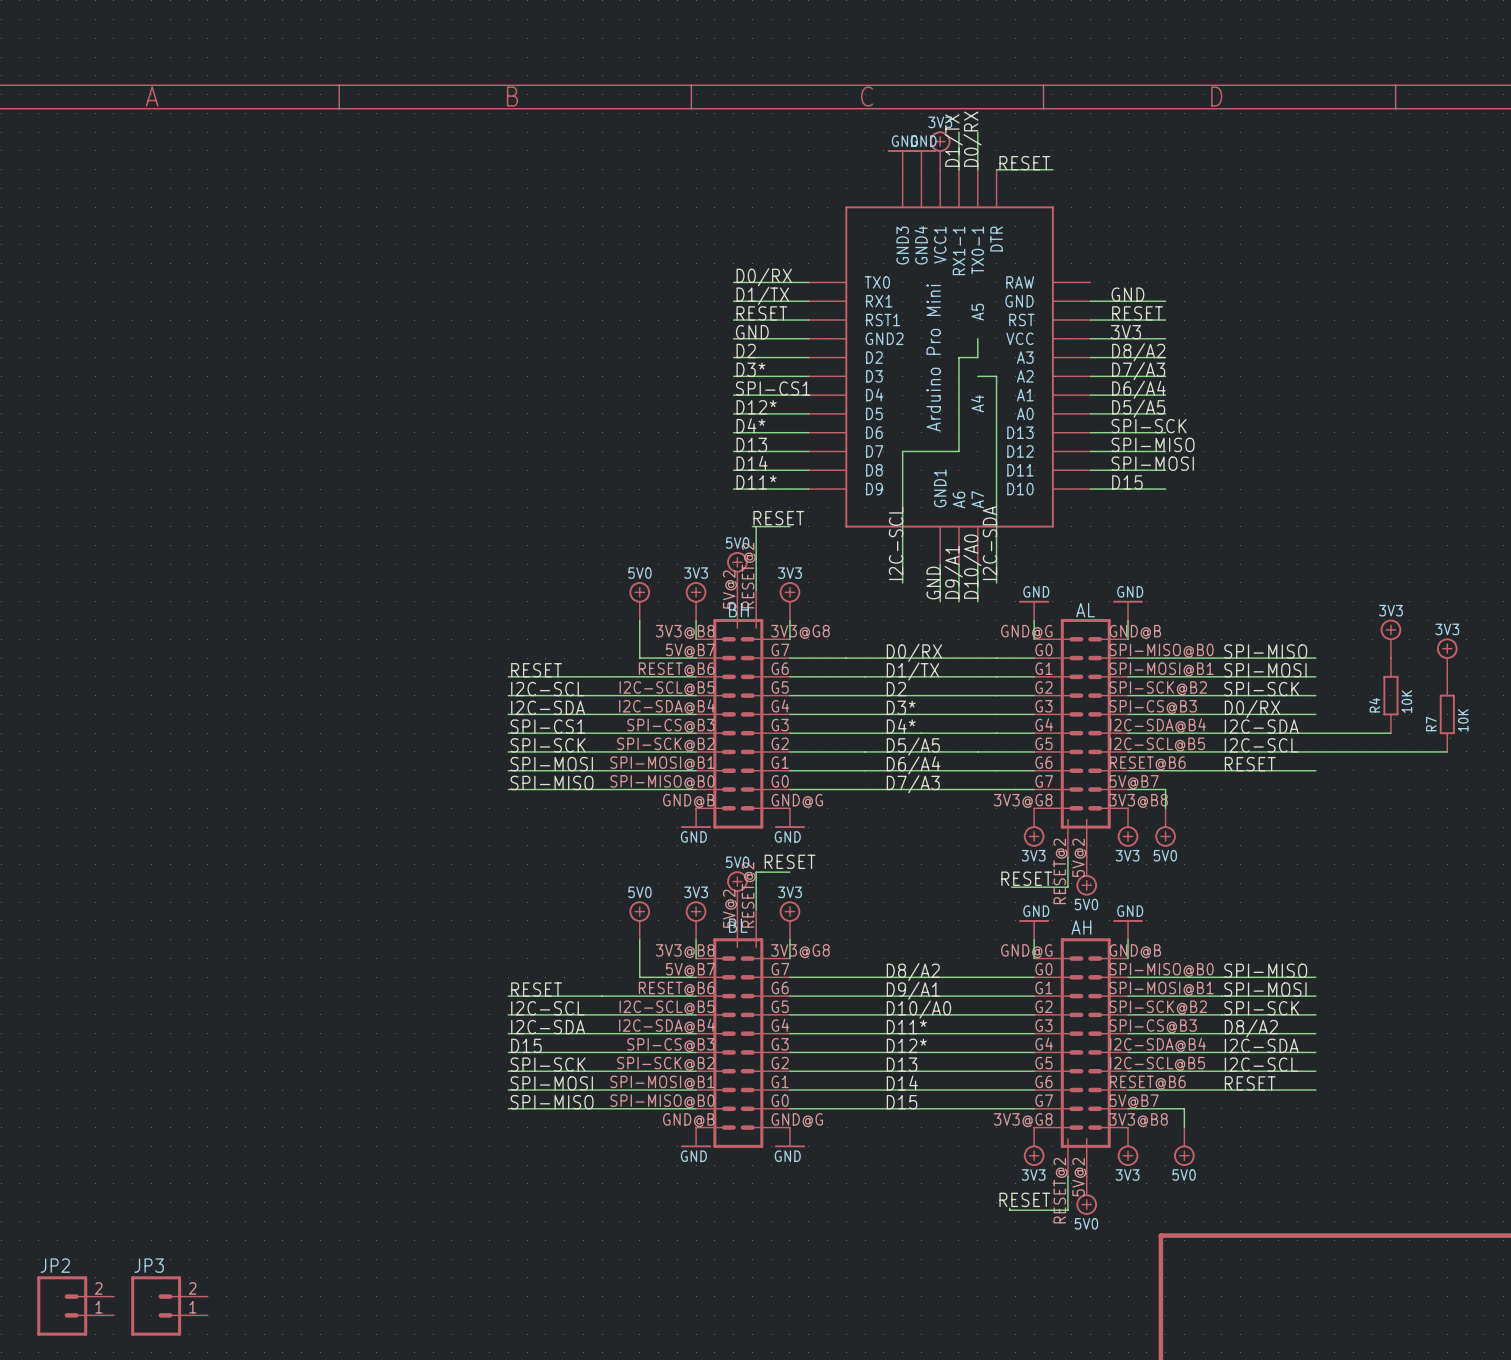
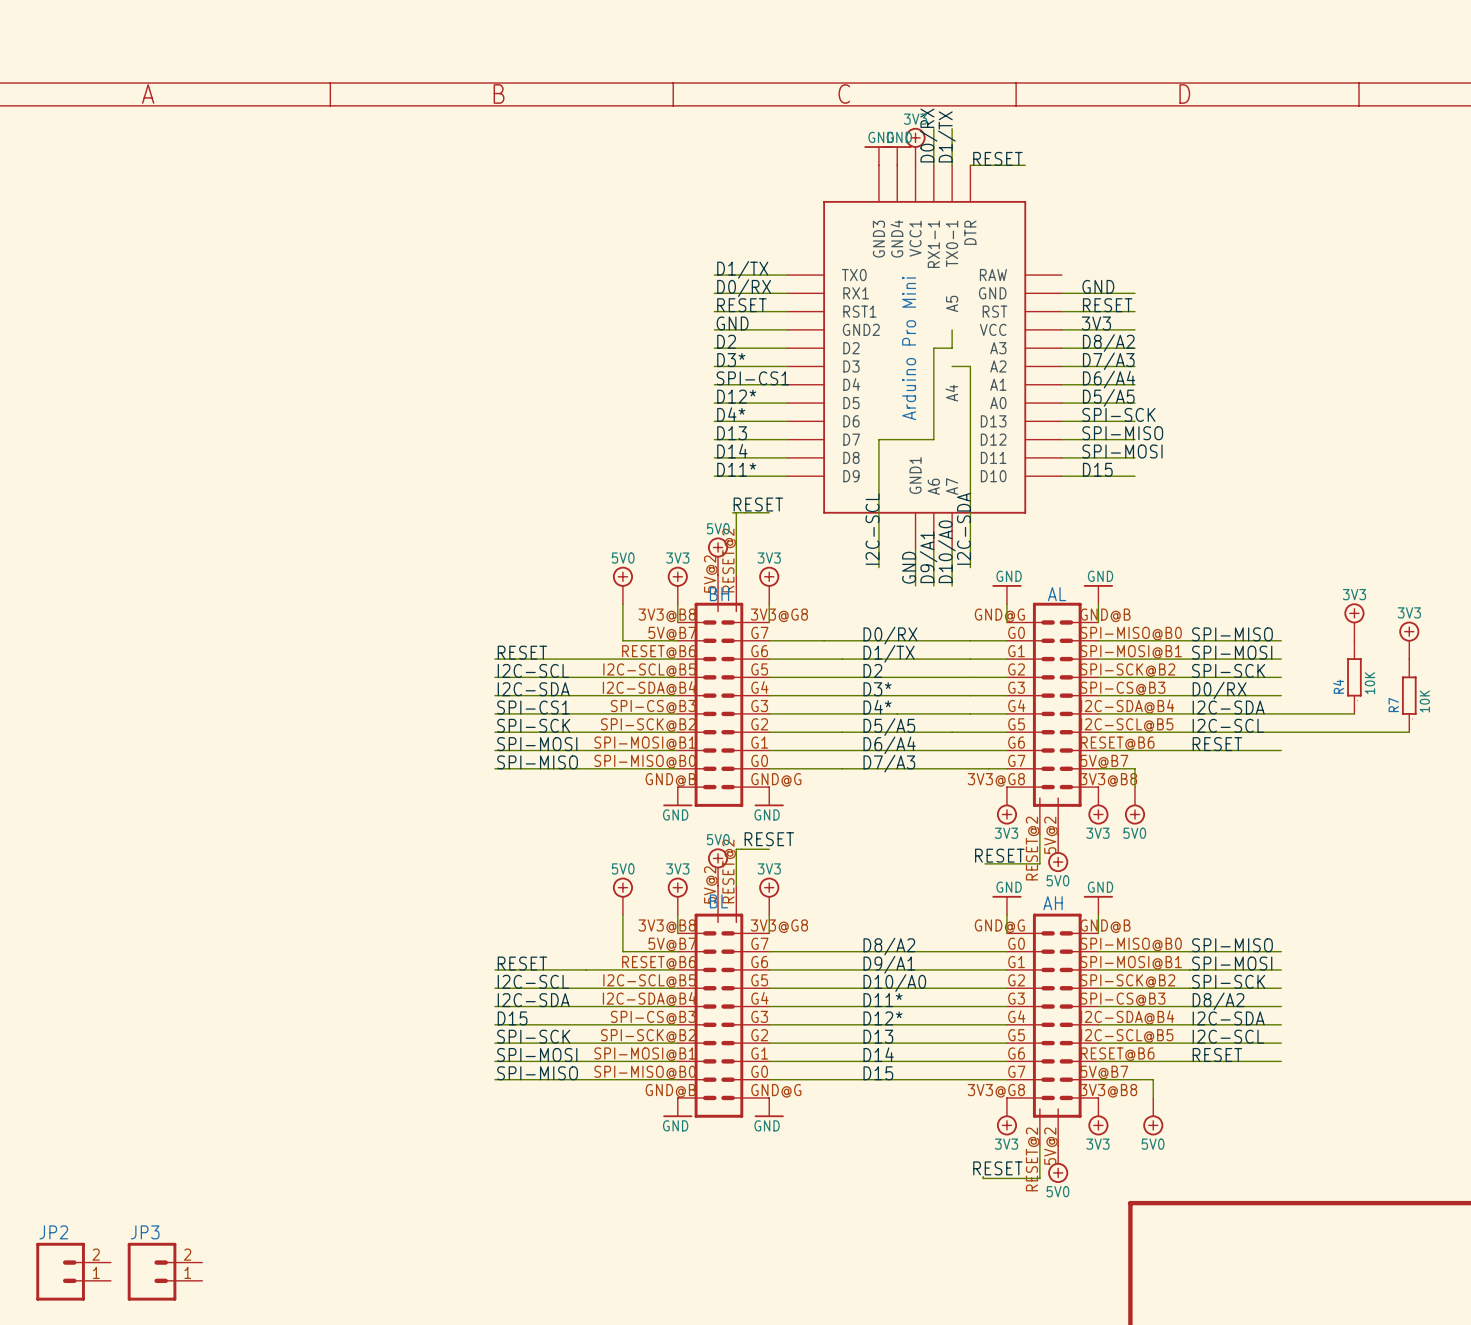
label: D0/RX (972, 139) -> D1/TX (946, 136)
label: D1/TX (953, 140) -> D0/RX (928, 135)
label: D0/RX (764, 277) -> D1/TX (742, 269)
label: D1/TX (762, 295) -> D0/RX (744, 288)

